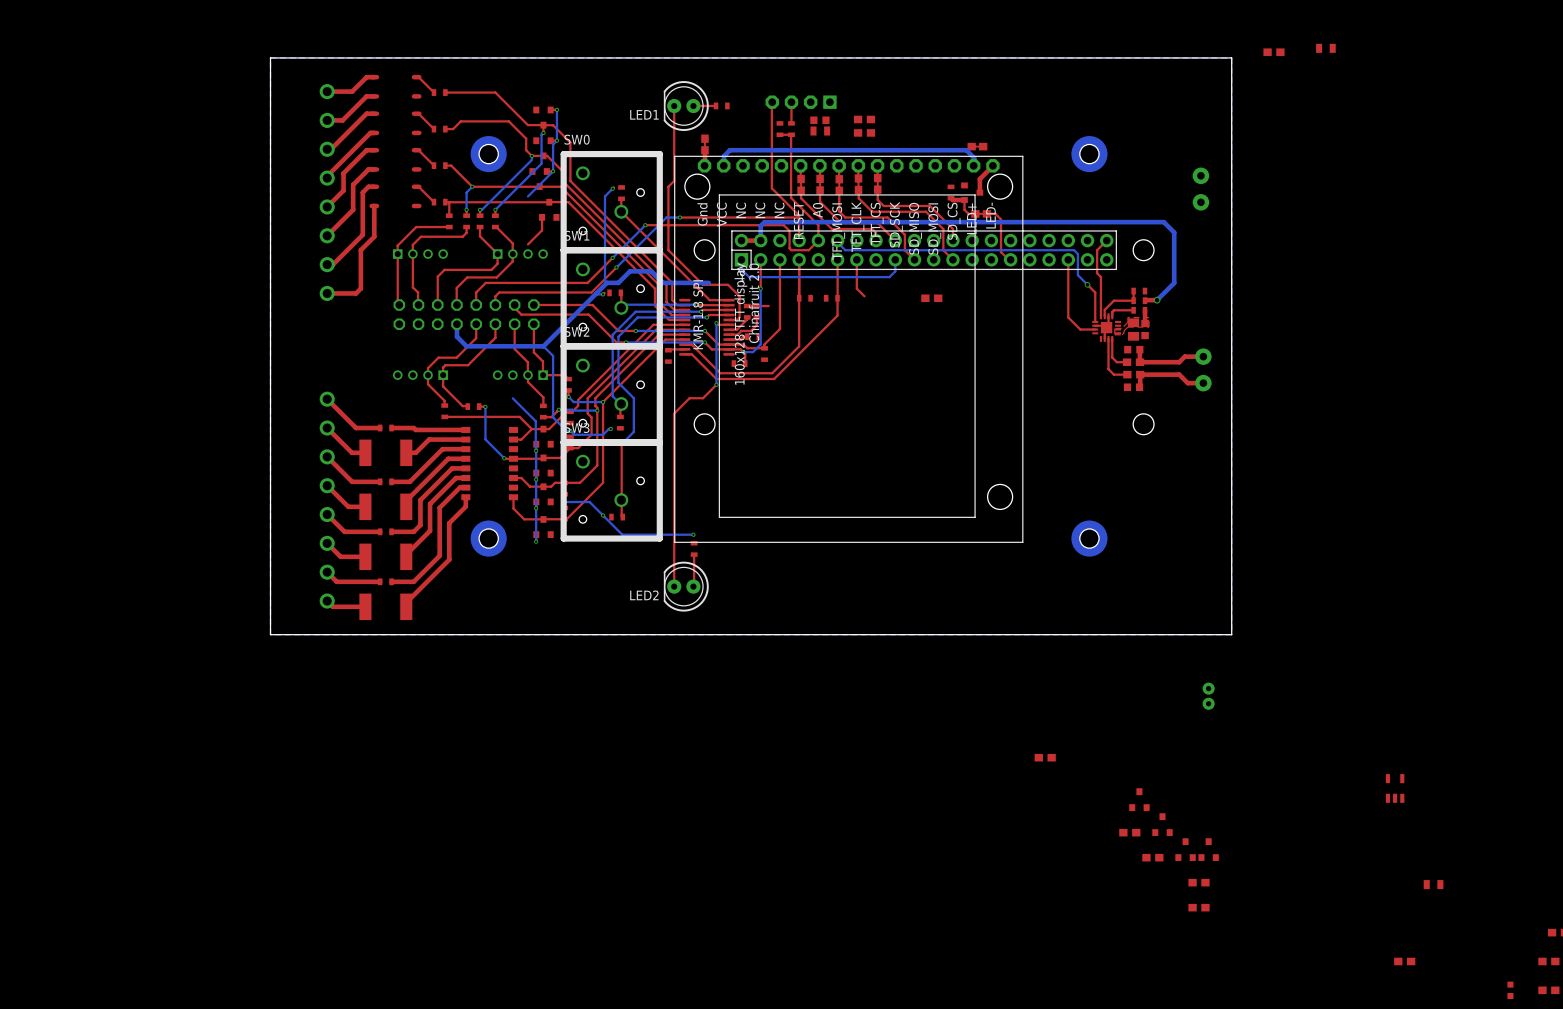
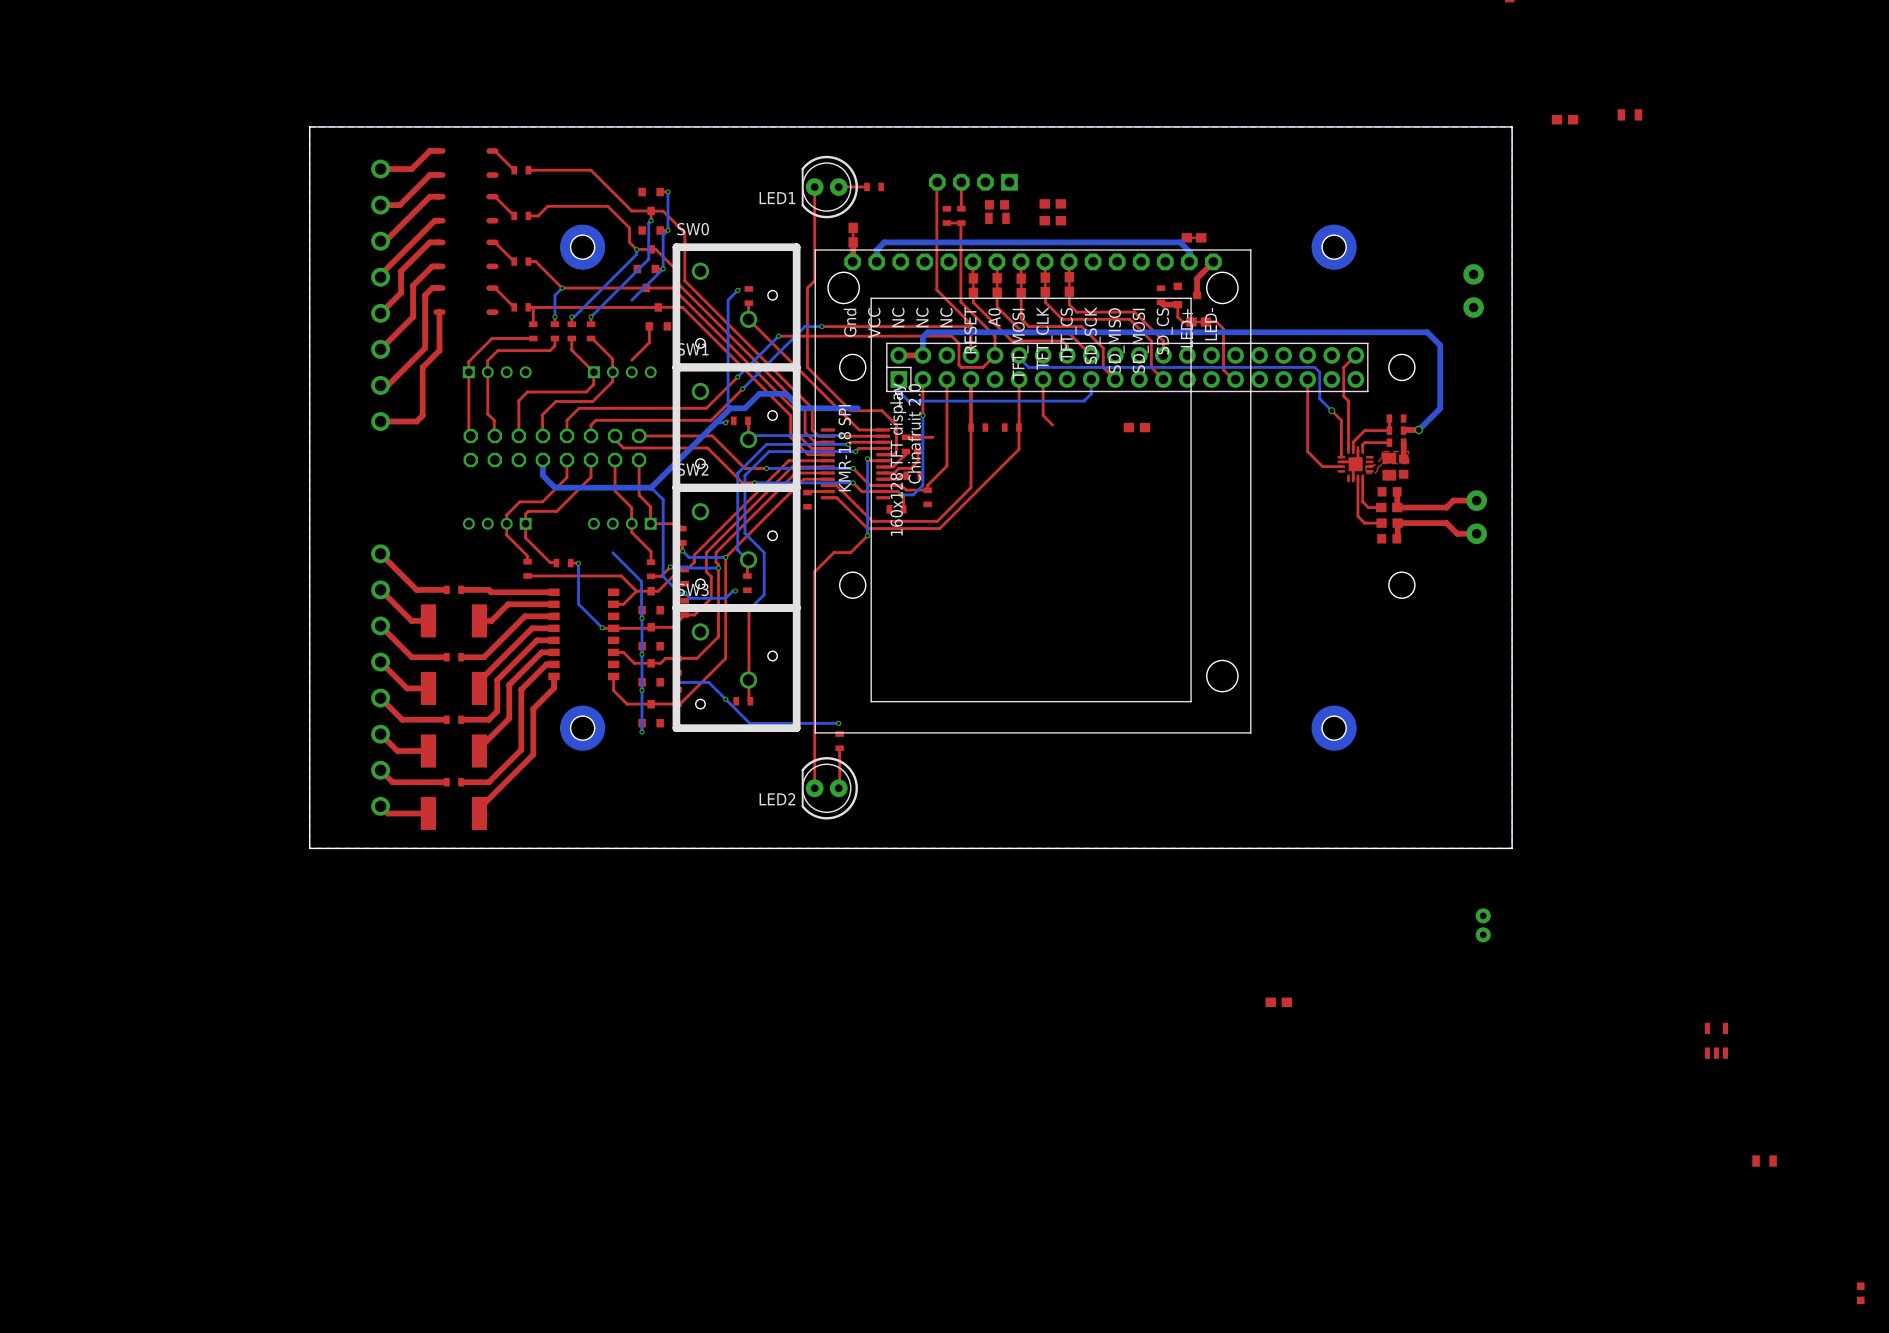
part: (1139, 799) -> none
part: (1162, 824) -> none
part: (1129, 832) -> none
part: (1185, 849) -> none
part: (1208, 849) -> none
part: (1152, 857) -> none
part: (1199, 882) -> none
part: (1199, 907) -> none
part: (1404, 961) -> none

